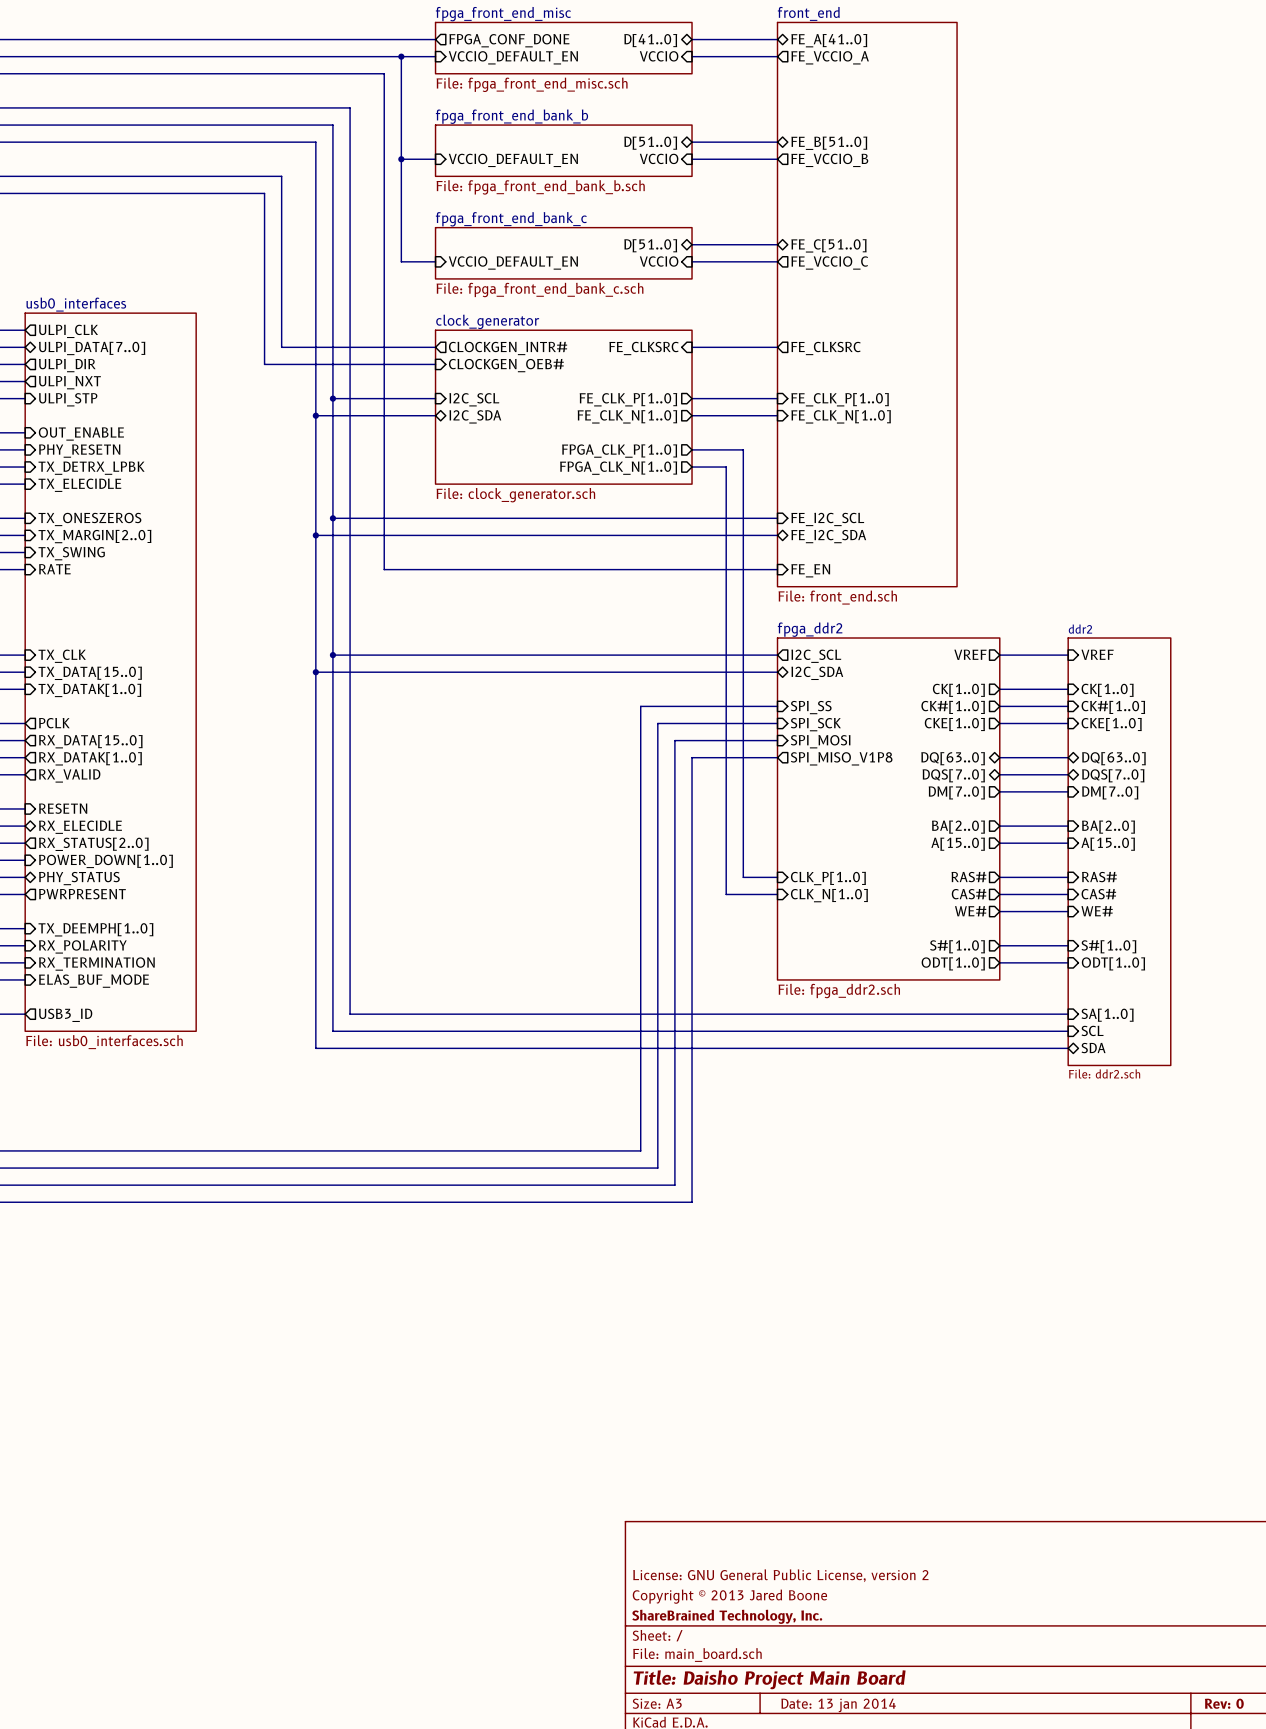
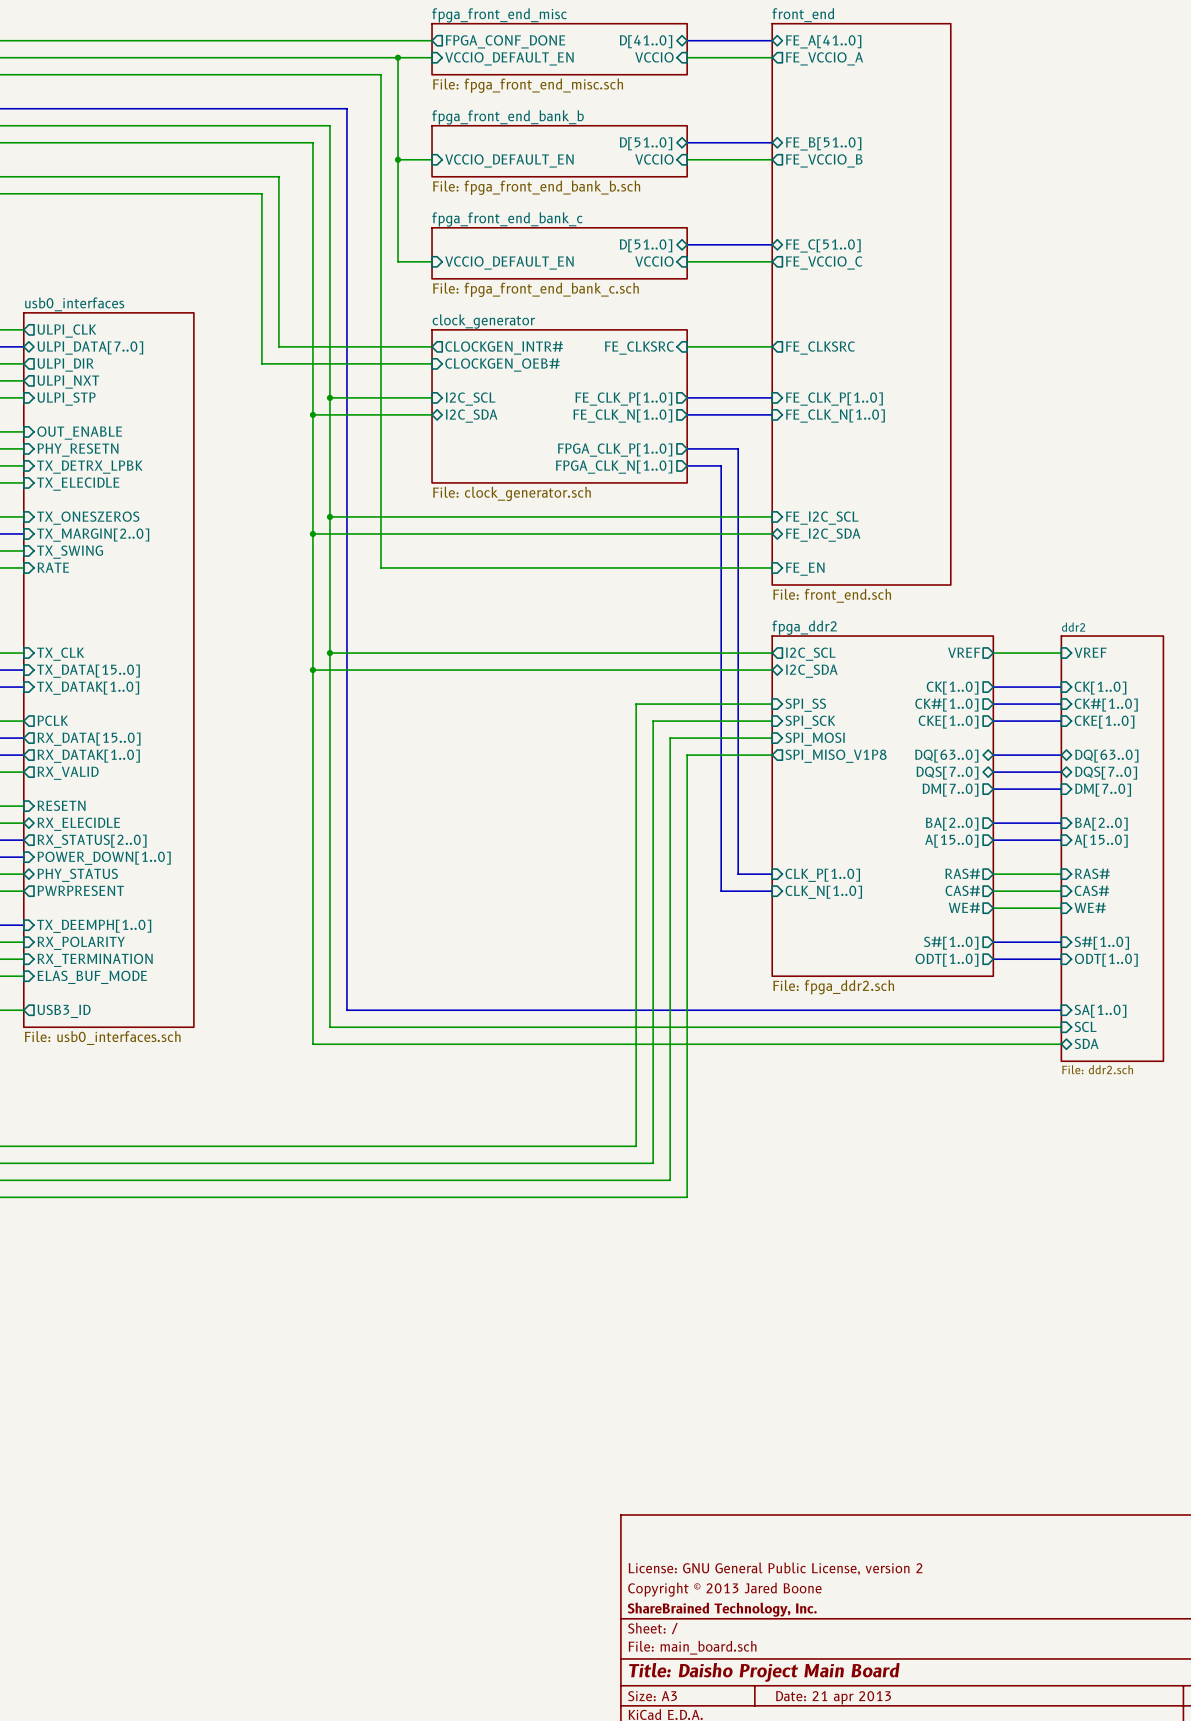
title block: Date: 13 jan 2014 (838, 1705) -> Date: 21 apr 2013 (833, 1697)

